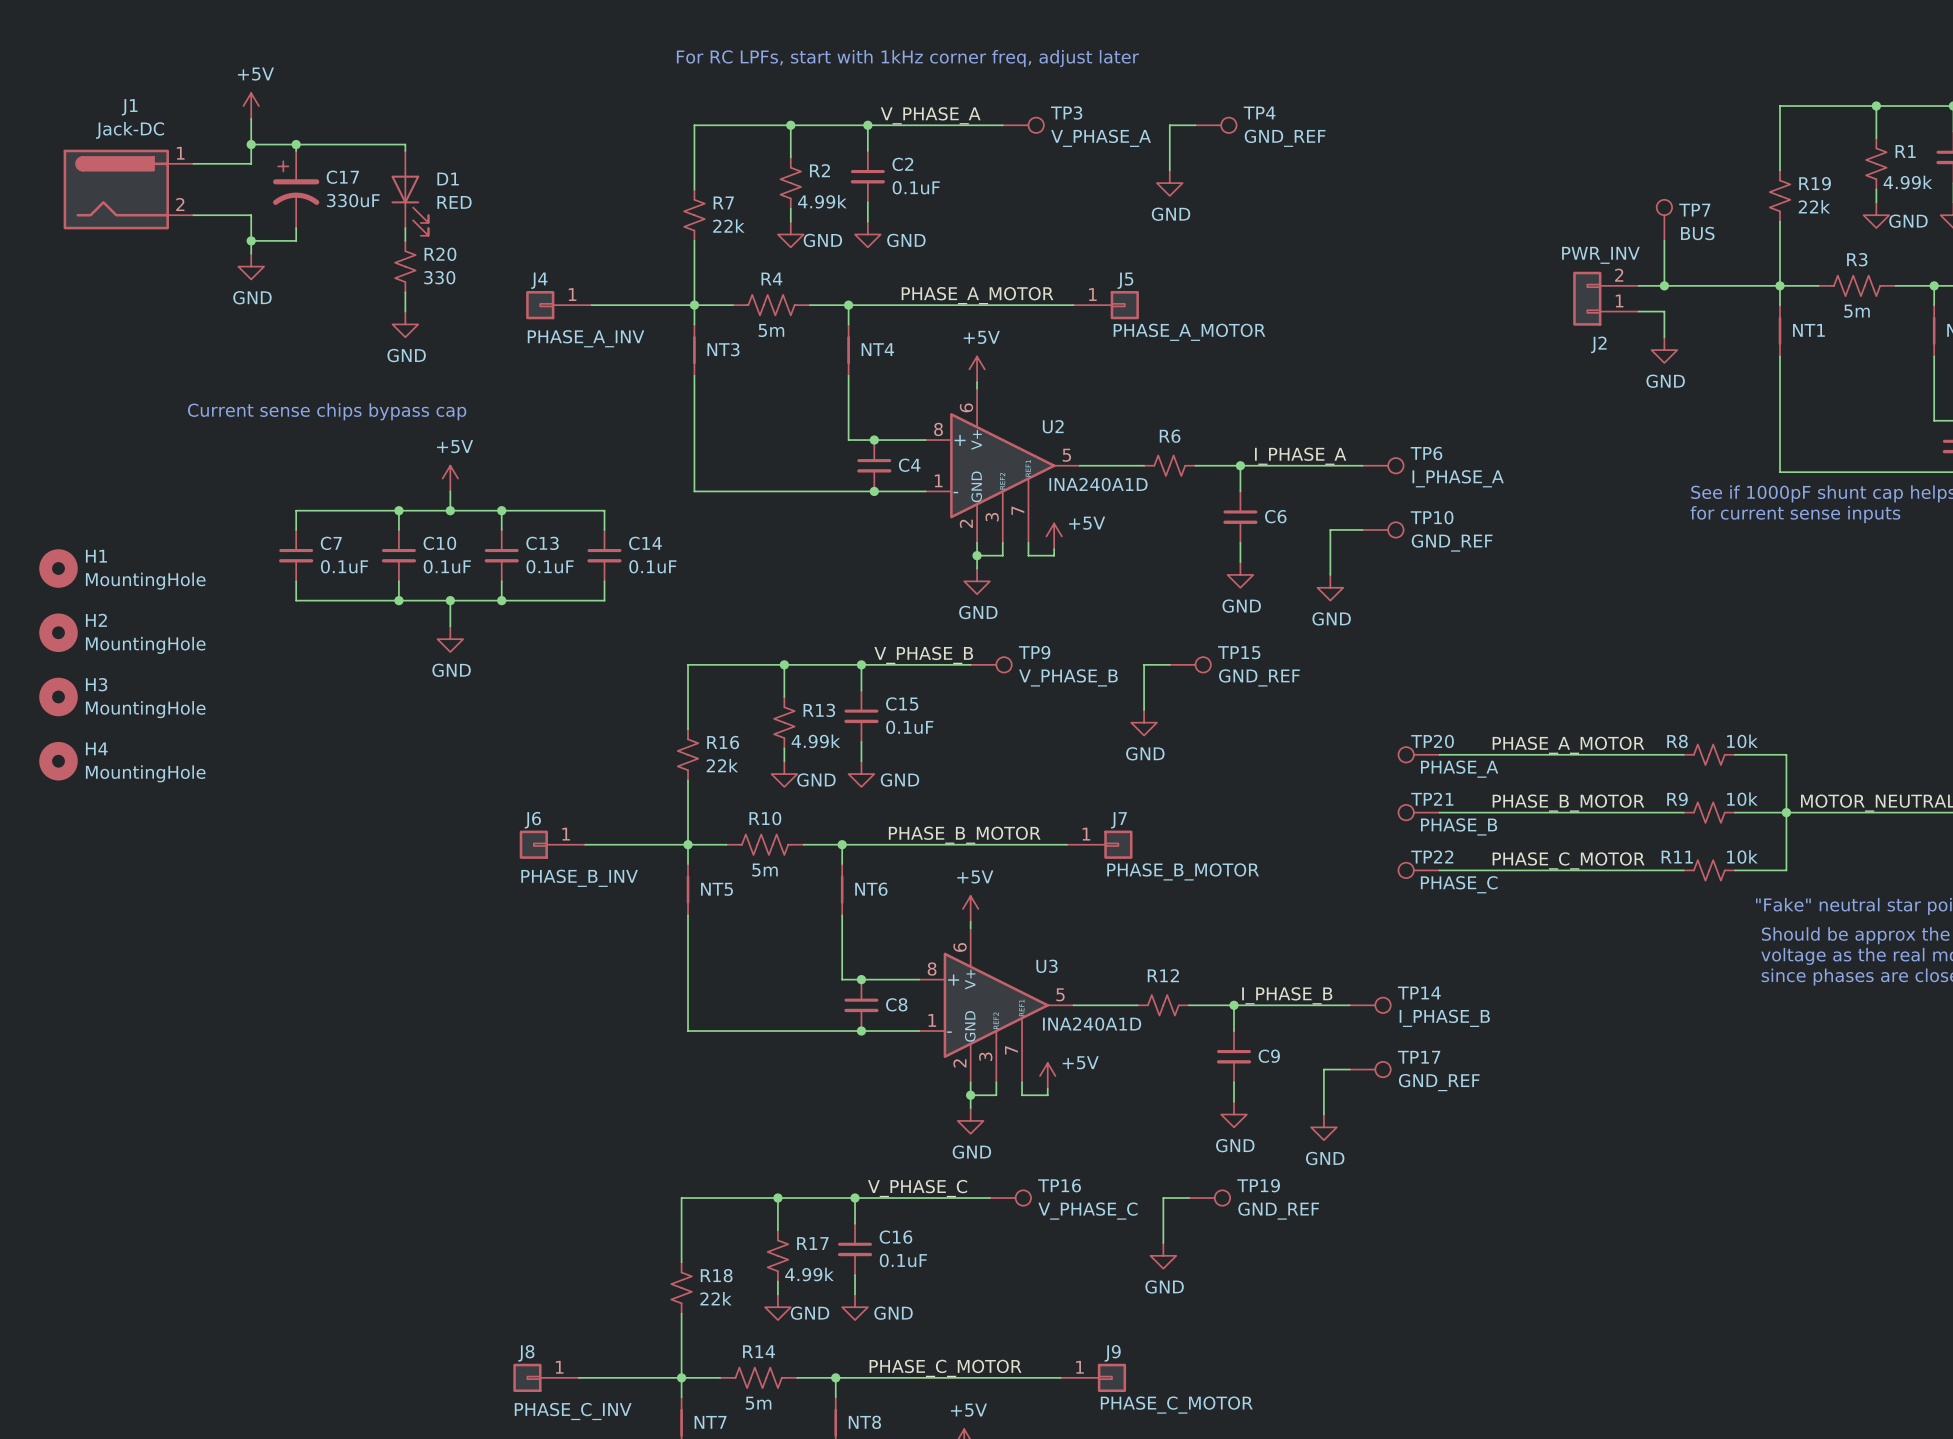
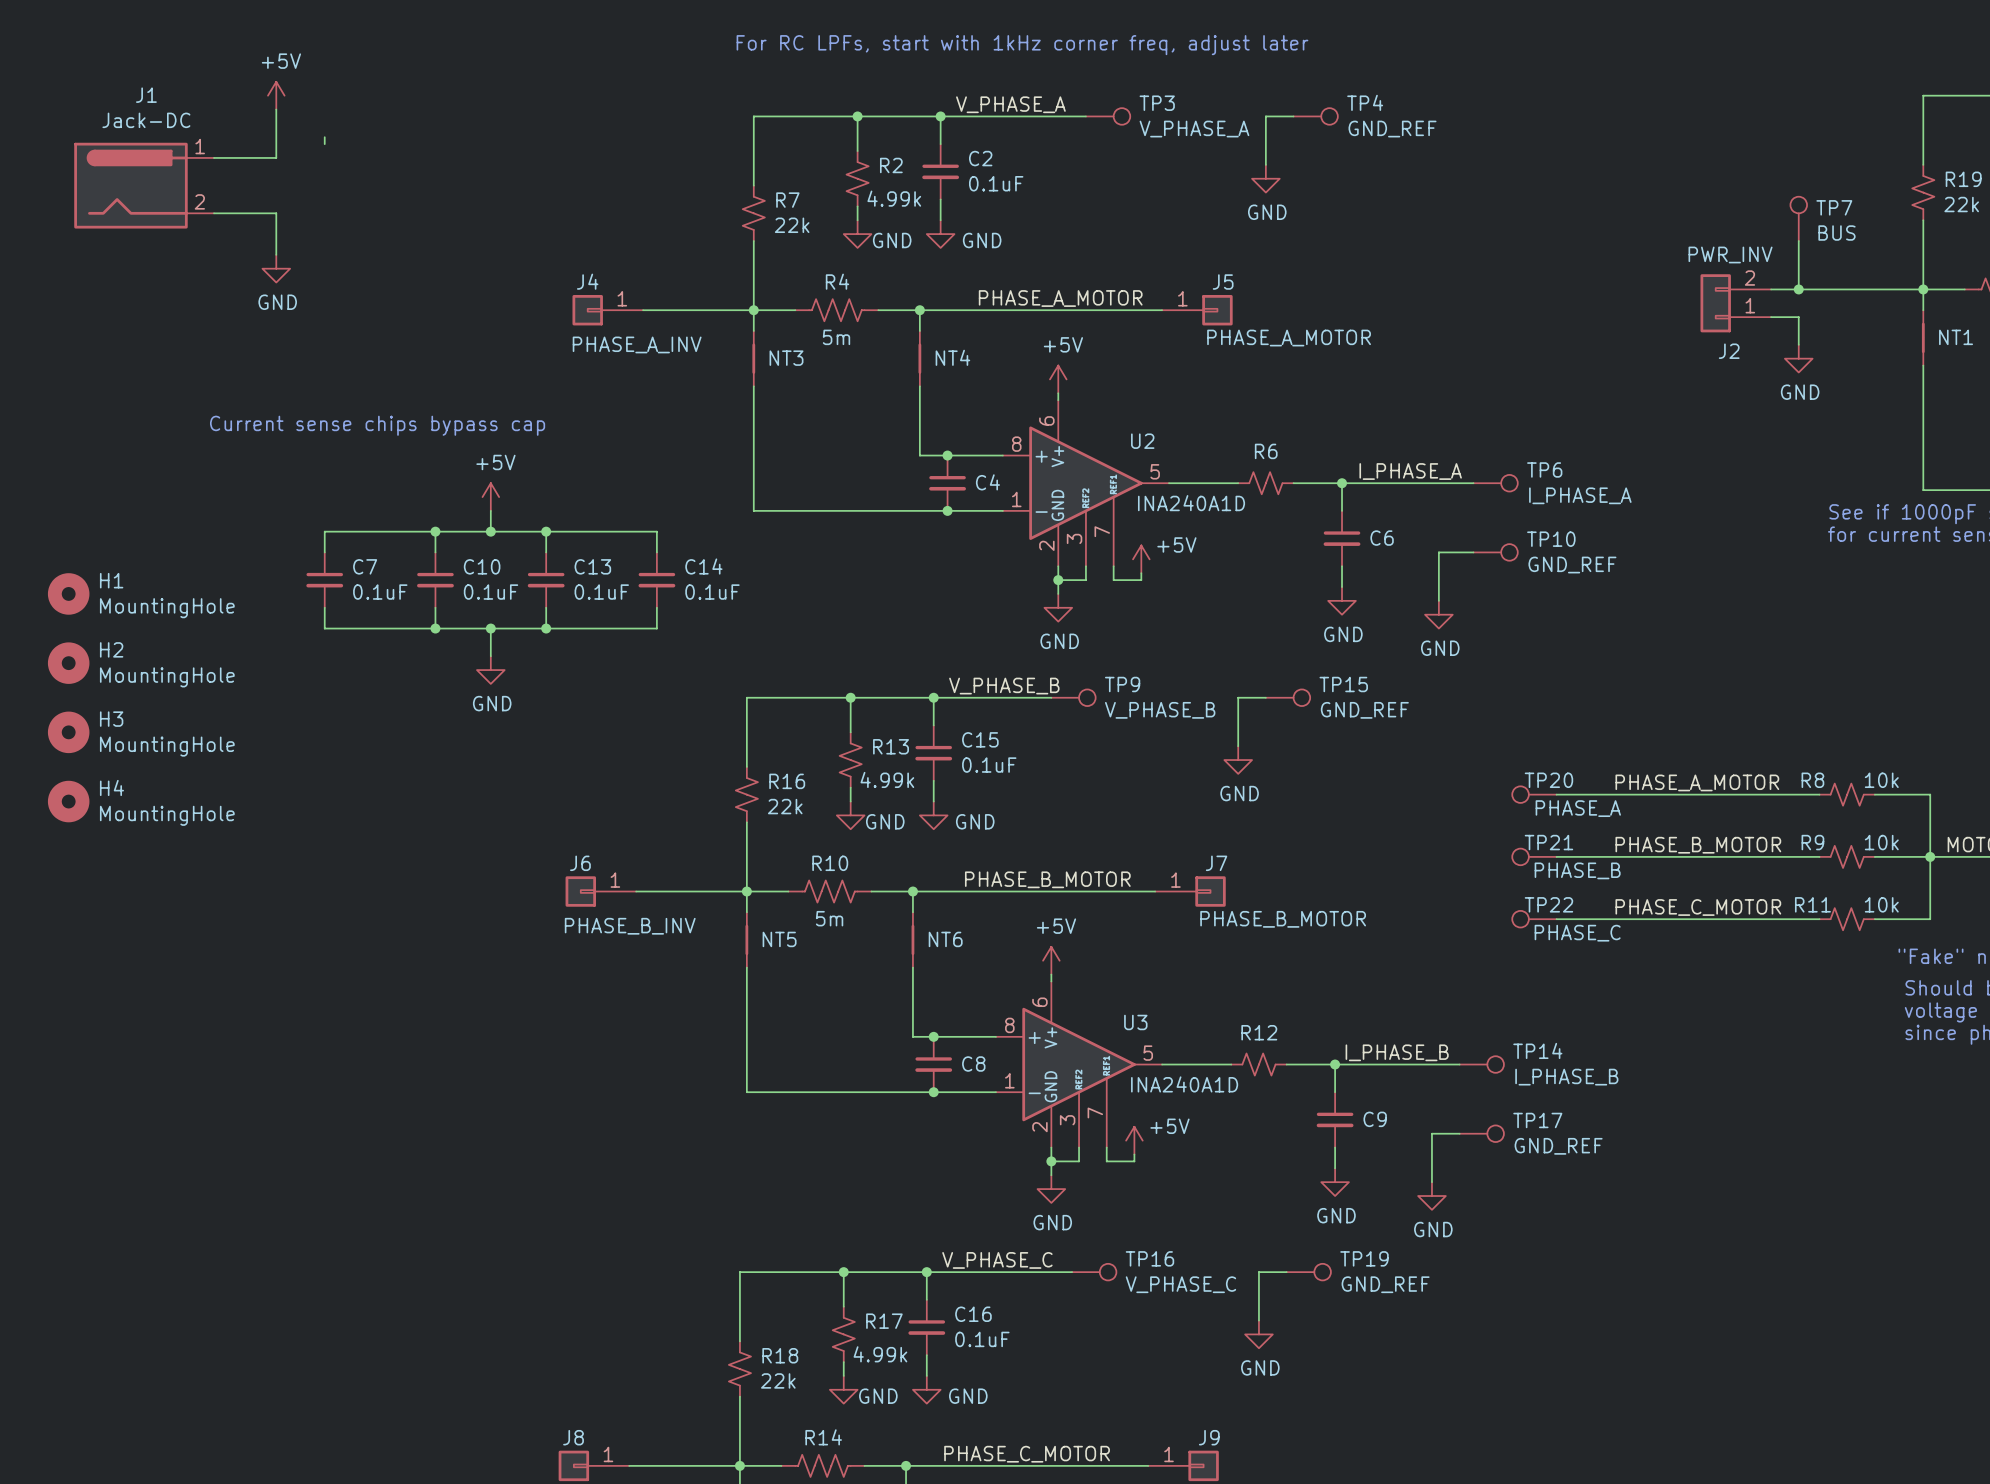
wire: (251, 144) (405, 144) (405, 150) -> none
junction: (251, 144) -> none
junction: (296, 144) -> none
C17: 330uF (296, 189) -> none
D1: RED (409, 193) -> none
wire: (296, 228) (296, 240) (251, 240) -> none
wire: (405, 228) (405, 240) -> none
junction: (251, 240) -> none
R20: 330 (405, 266) -> none
wire: (405, 292) (405, 311) -> none
power symbol: GND (405, 324) -> none

